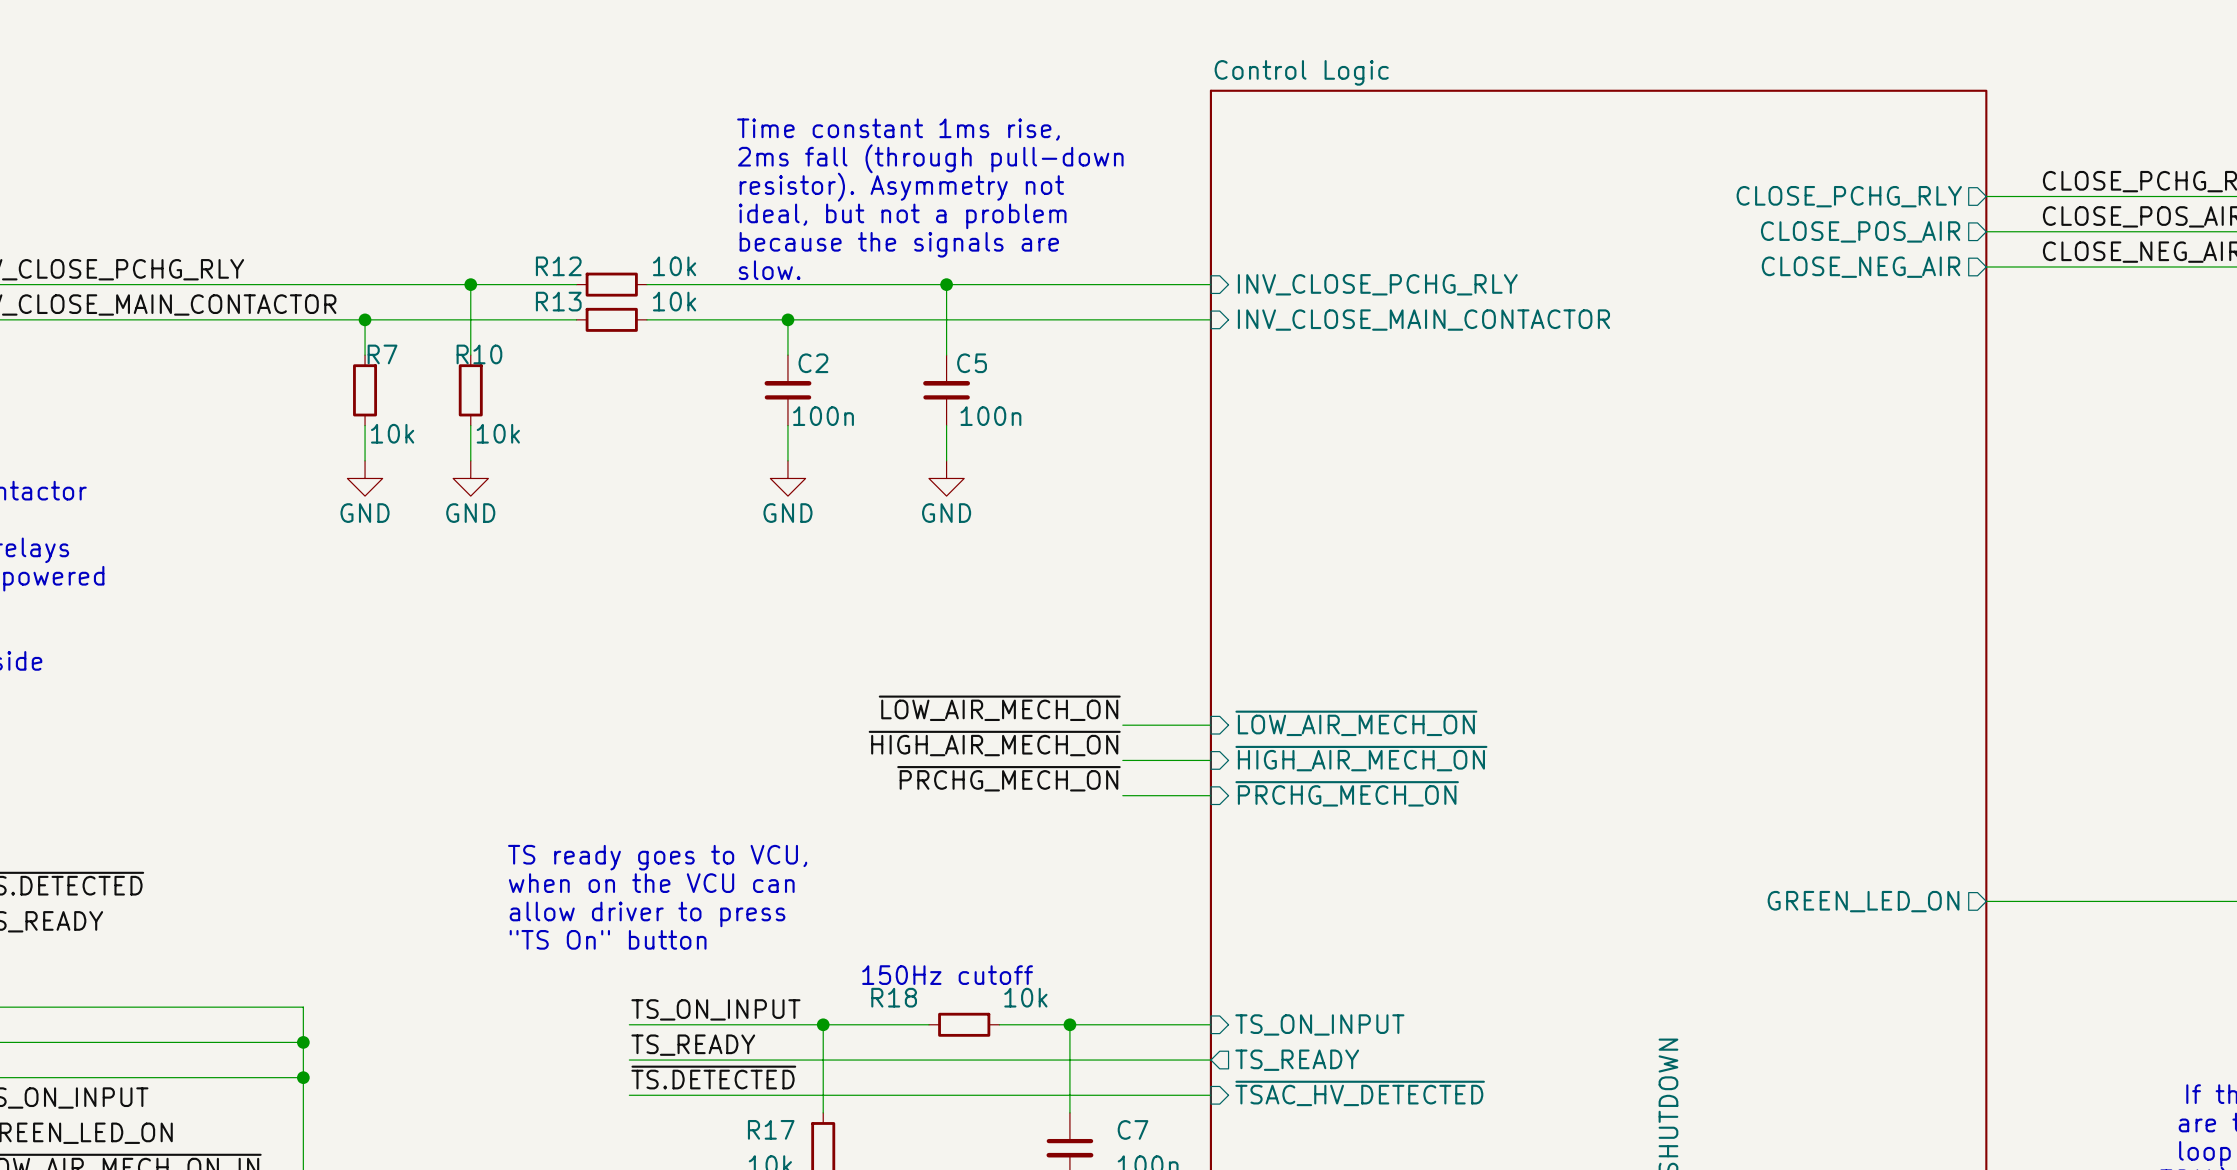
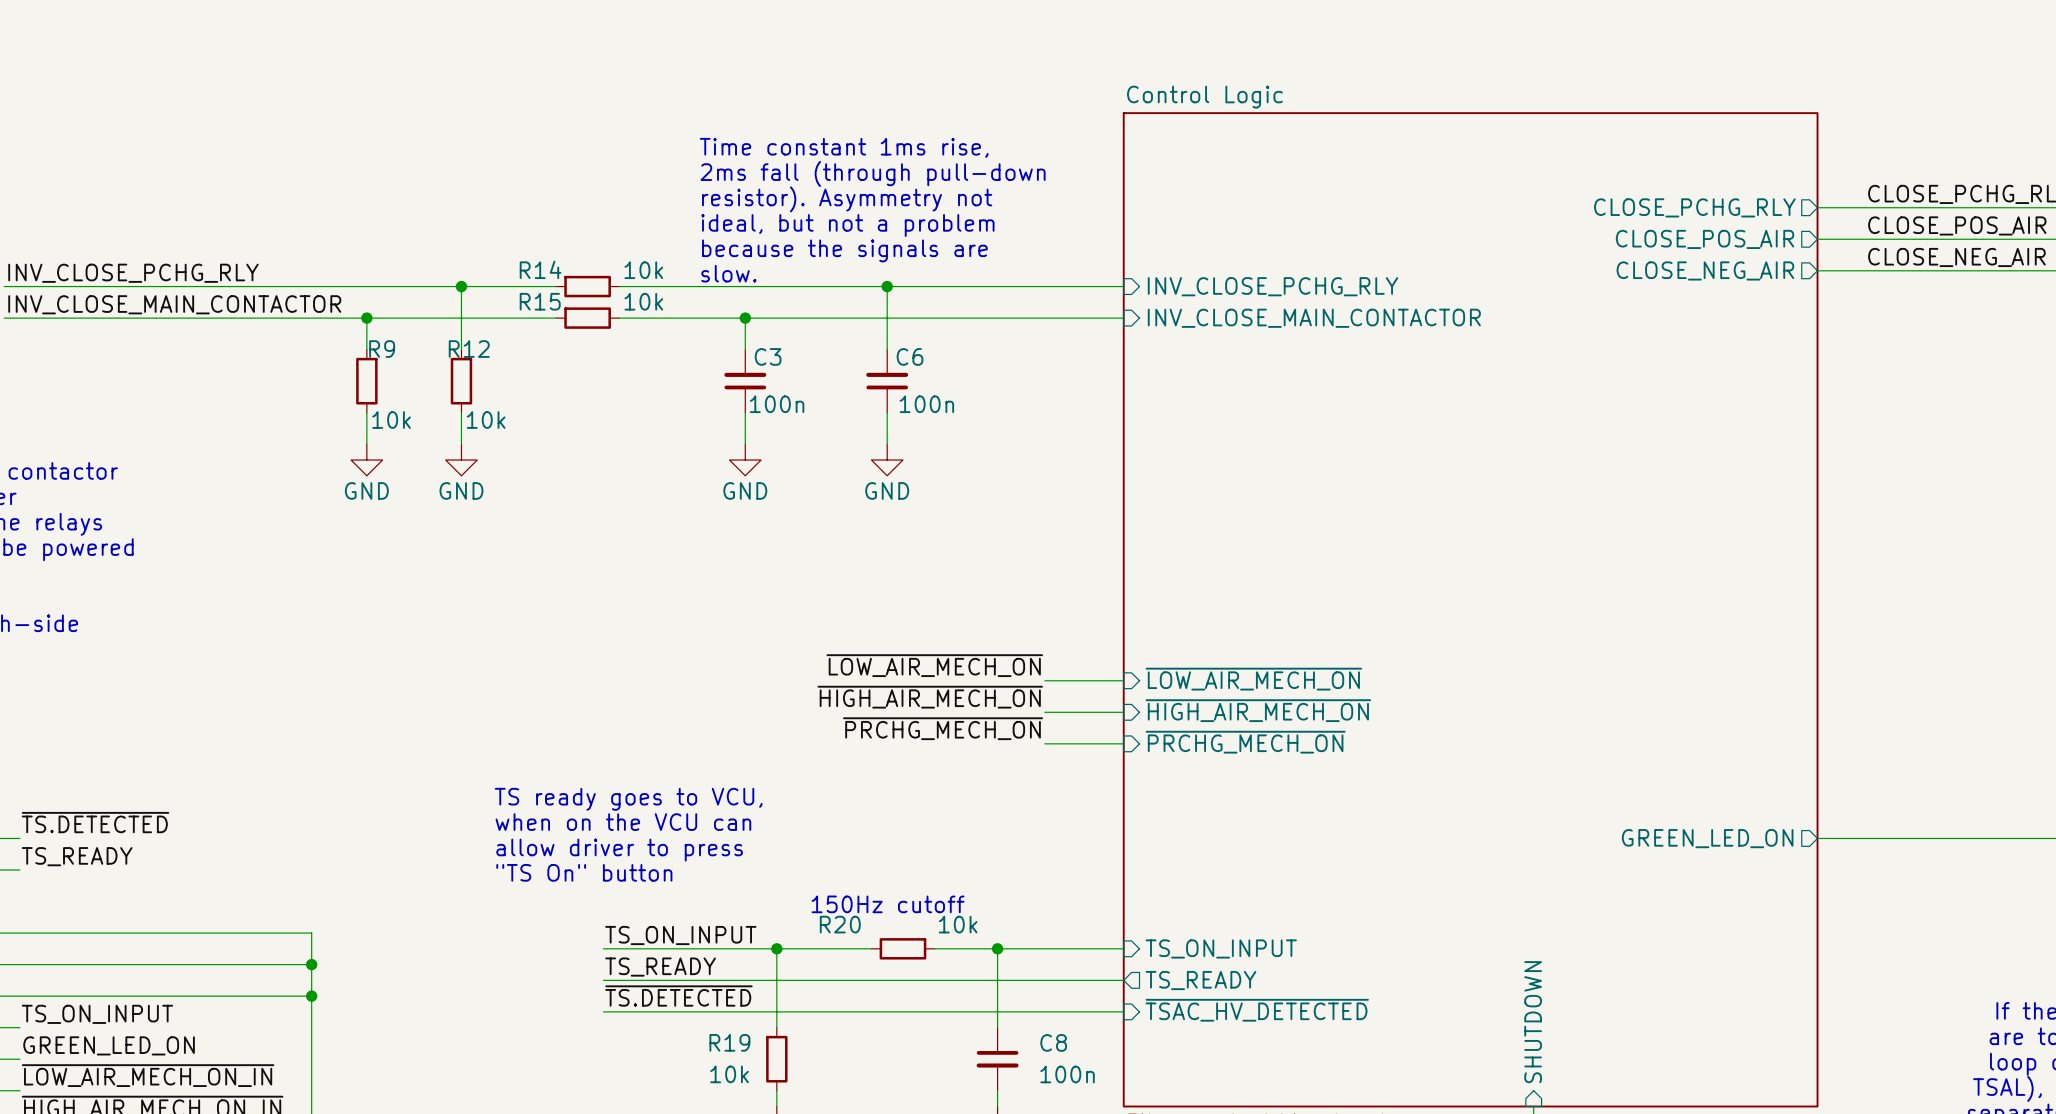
R12 name: R12 (558, 266) -> R14 (540, 269)
R13 name: R13 (558, 301) -> R15 (540, 301)
R7 name: R7 (382, 354) -> R9 (382, 349)
R10 name: R10 (479, 354) -> R12 (469, 349)
C2 name: C2 (813, 363) -> C3 (768, 356)
C5 name: C5 (972, 363) -> C6 (909, 356)
R18 name: R18 (894, 997) -> R20 (840, 924)
R17 name: R17 (771, 1129) -> R19 (729, 1042)
C7 name: C7 (1133, 1129) -> C8 (1053, 1042)

